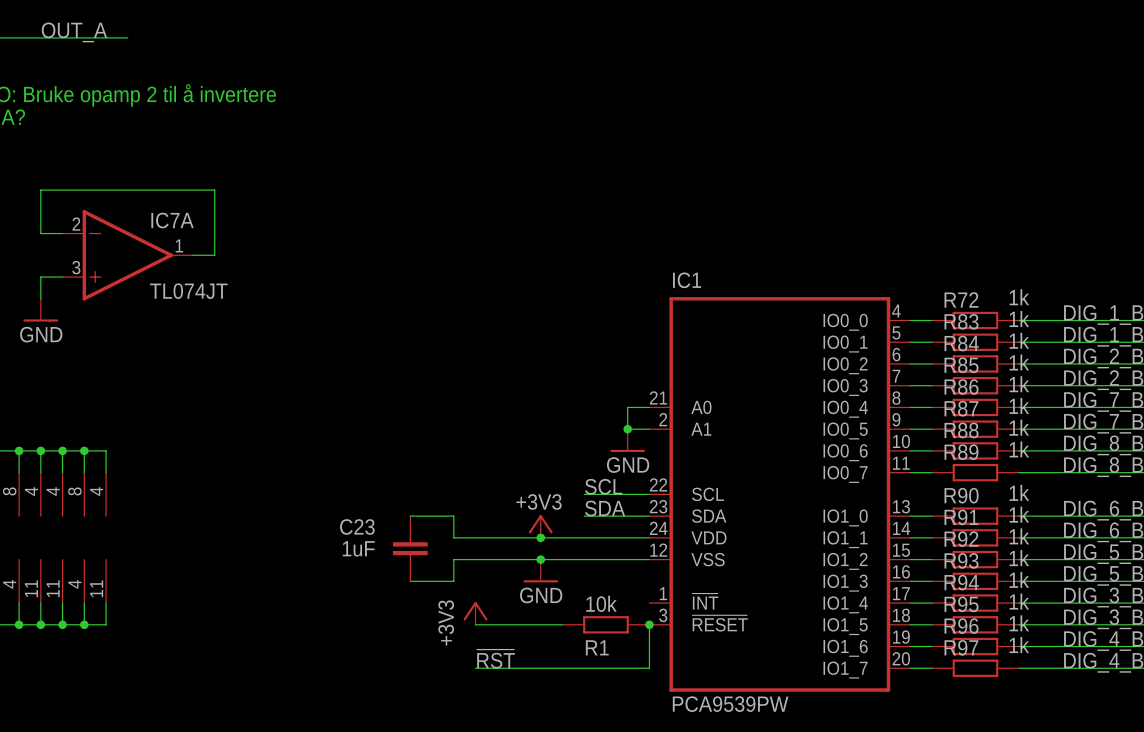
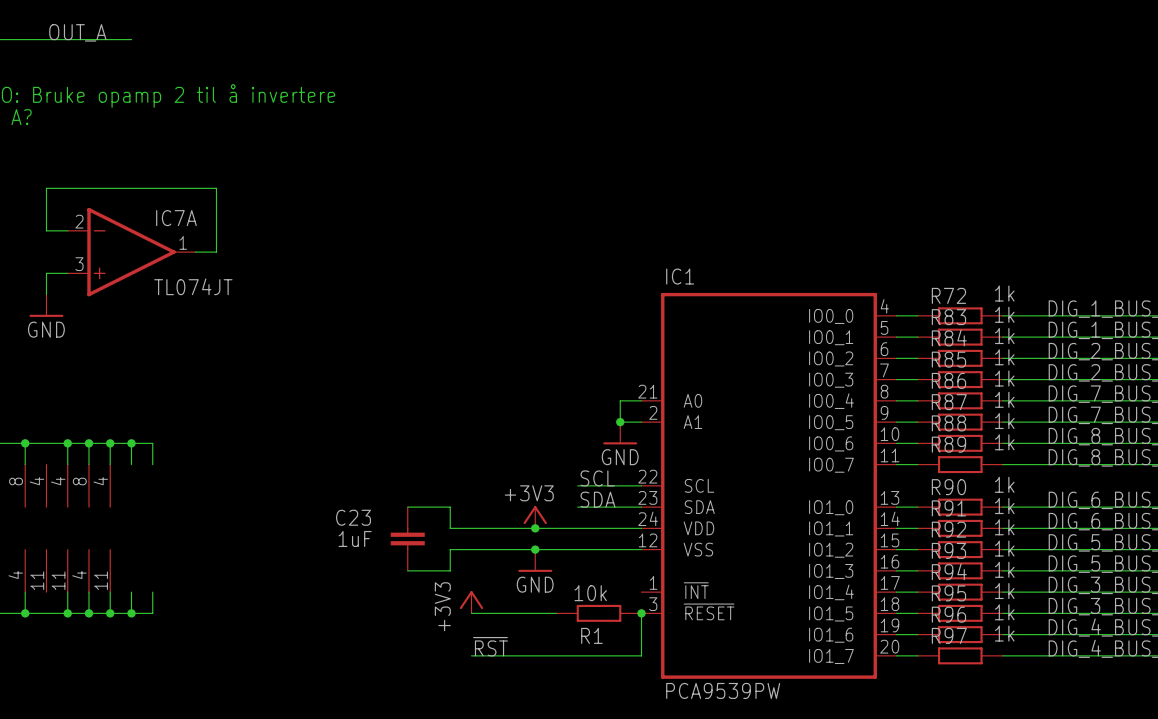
wire: (40, 450) (40, 472) -> (131, 443) (131, 464)
junction: (40, 450) -> none
wire: none -> (110, 443) (152, 443) (152, 464)
junction: none -> (110, 443)
junction: none -> (131, 443)
wire: (40, 603) (40, 624) -> (131, 592) (131, 613)
wire: none -> (152, 592) (152, 613) (110, 613)
junction: (40, 624) -> none
junction: none -> (110, 613)
junction: none -> (131, 613)

